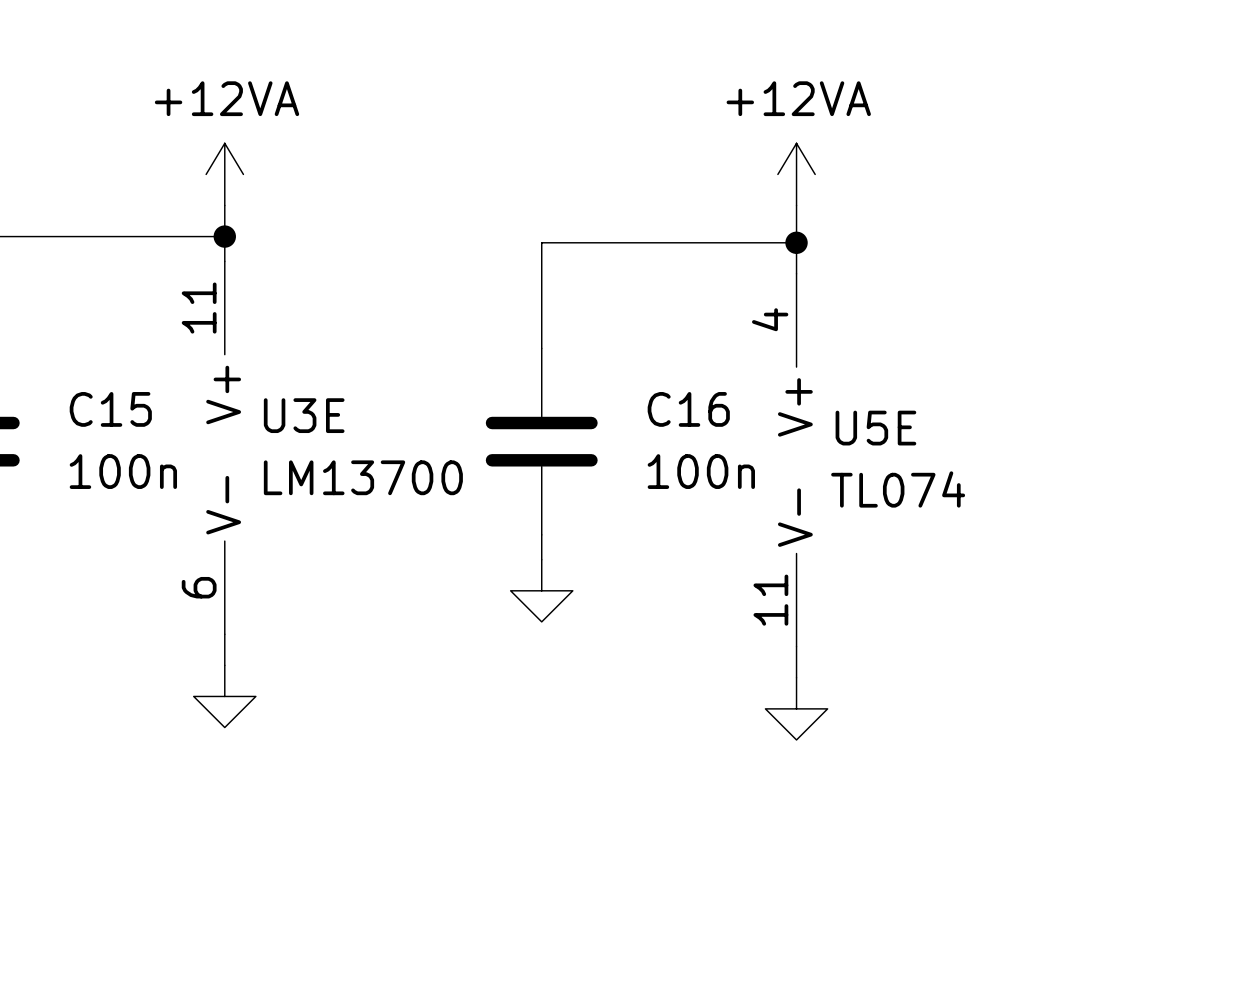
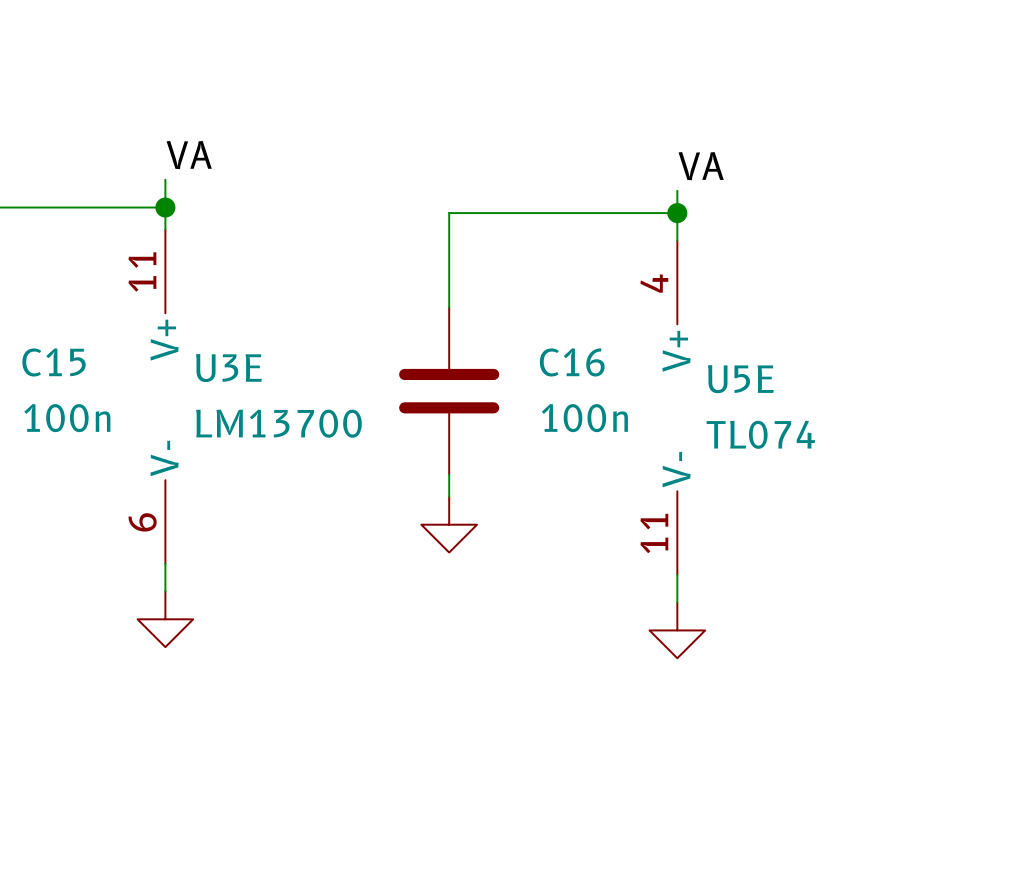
power symbol: +12VA (224, 174) -> none
power symbol: +12VA (796, 174) -> none
label: none -> VA (189, 155)
label: none -> VA (701, 166)
wire: (796, 205) (796, 217) -> none

